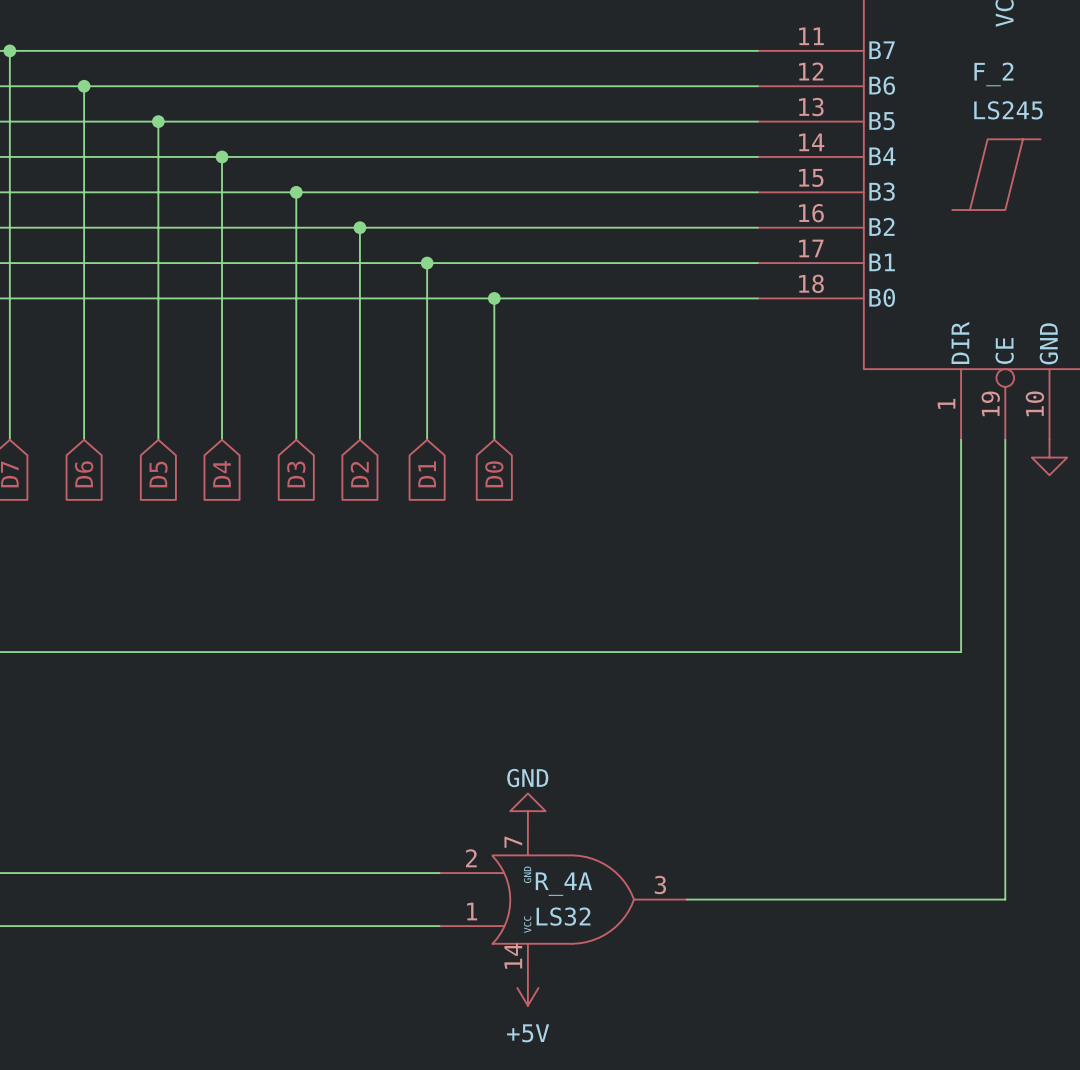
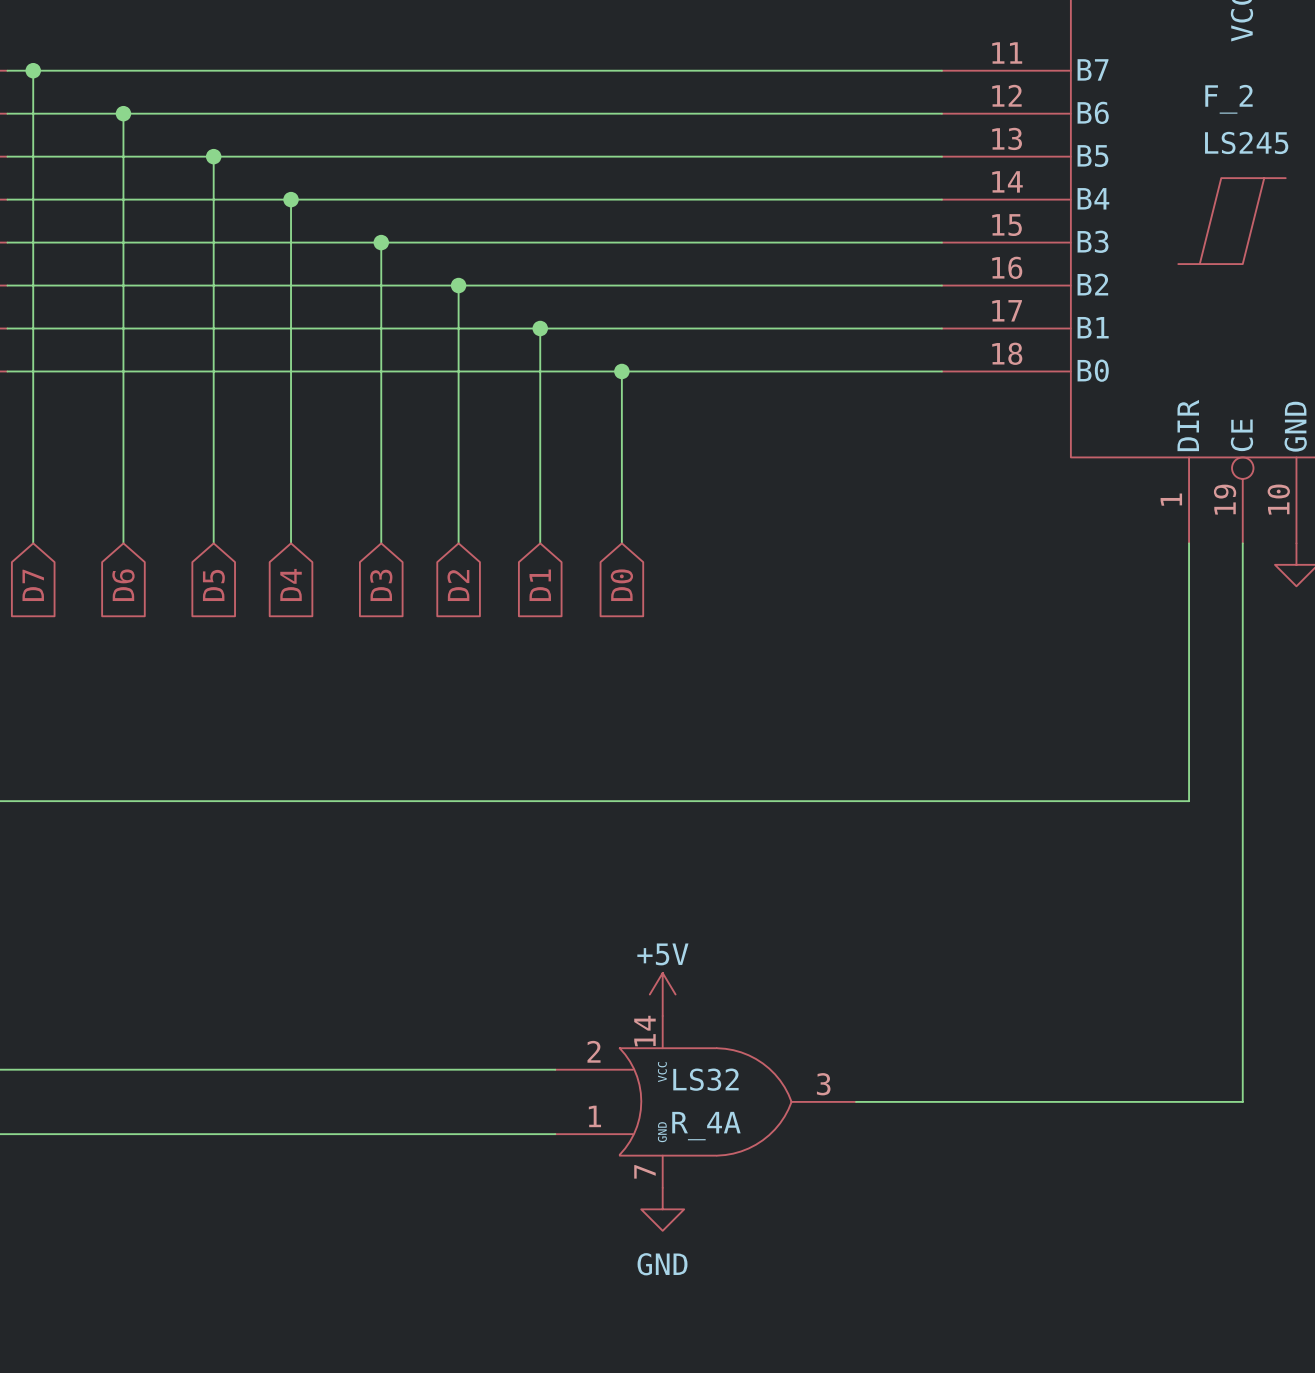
power symbol: GND (527, 811) -> +5V (662, 994)
R_4A symbol: [439, 828, 688, 971] -> [555, 1015, 857, 1188]
R_4A name position: R_4A (563, 884) -> R_4A (706, 1126)
R_4A value position: LS32 (563, 916) -> LS32 (705, 1079)
power symbol: +5V (527, 987) -> GND (662, 1209)

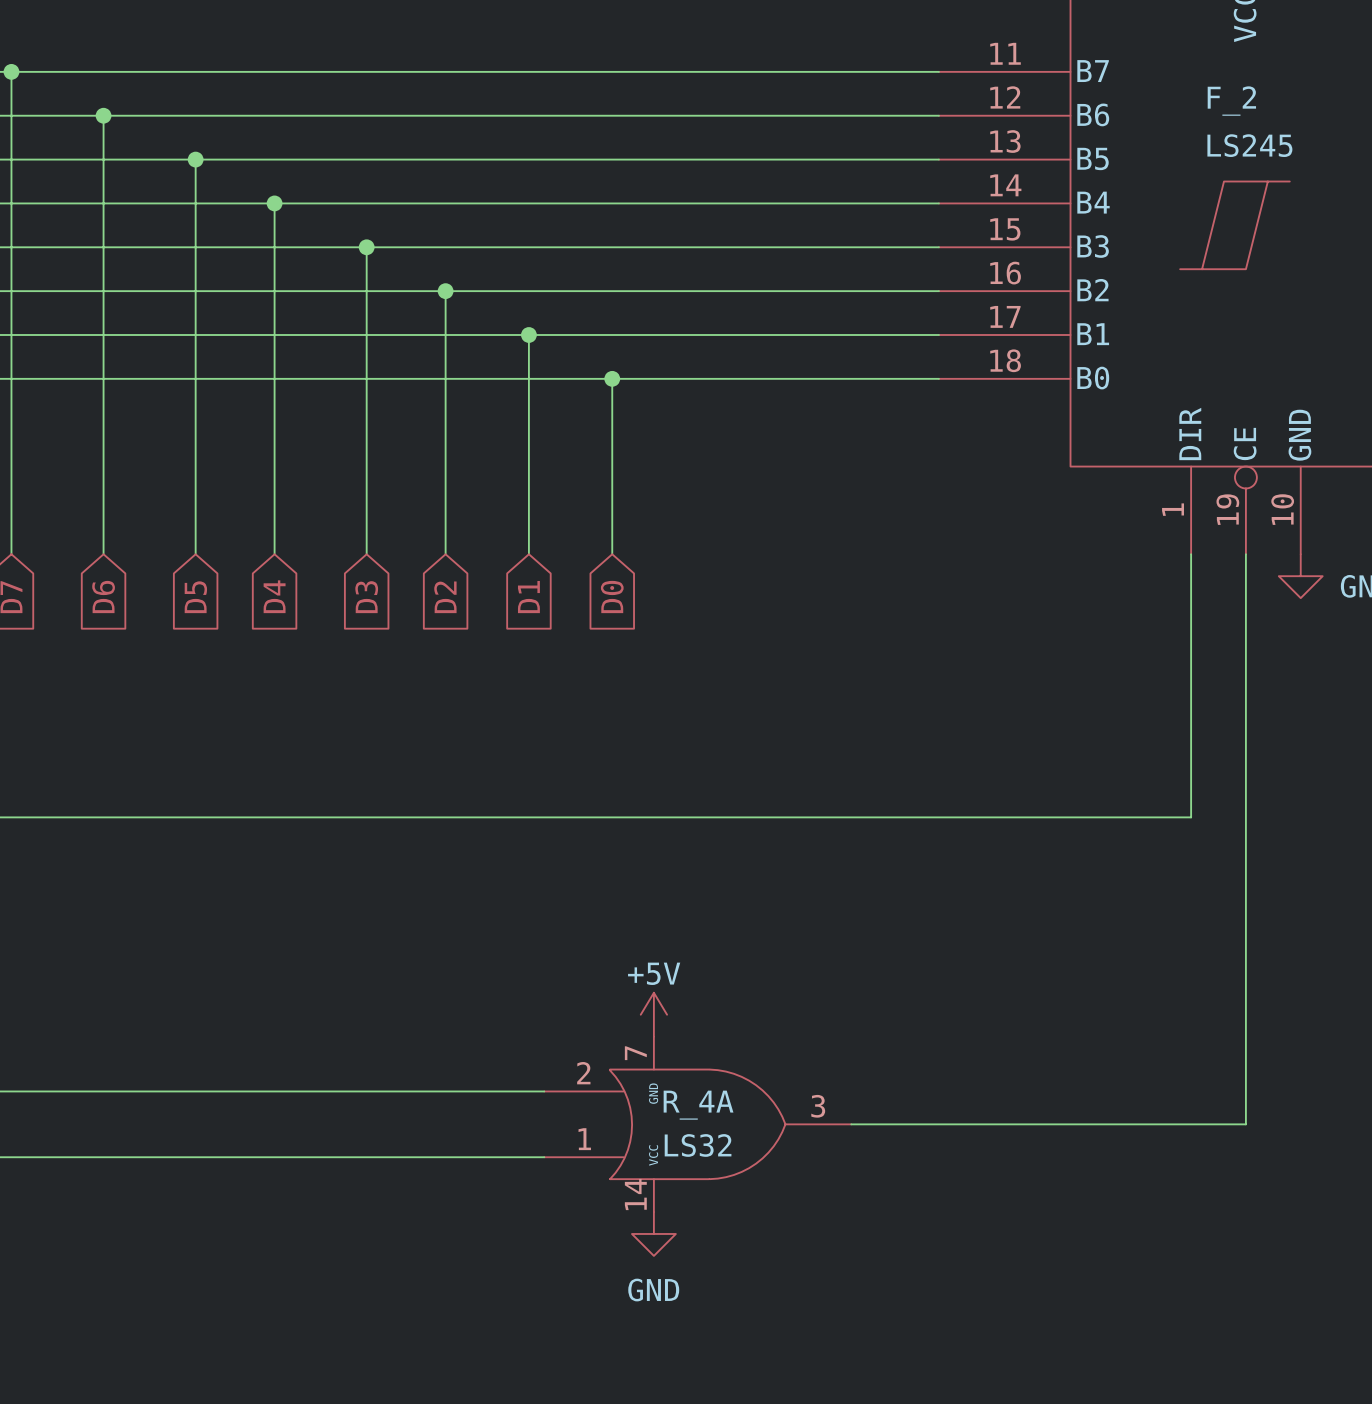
R_4A symbol: [555, 1015, 857, 1188] -> [544, 1036, 852, 1213]
R_4A value position: LS32 (705, 1079) -> LS32 (698, 1145)
R_4A name position: R_4A (706, 1126) -> R_4A (698, 1105)

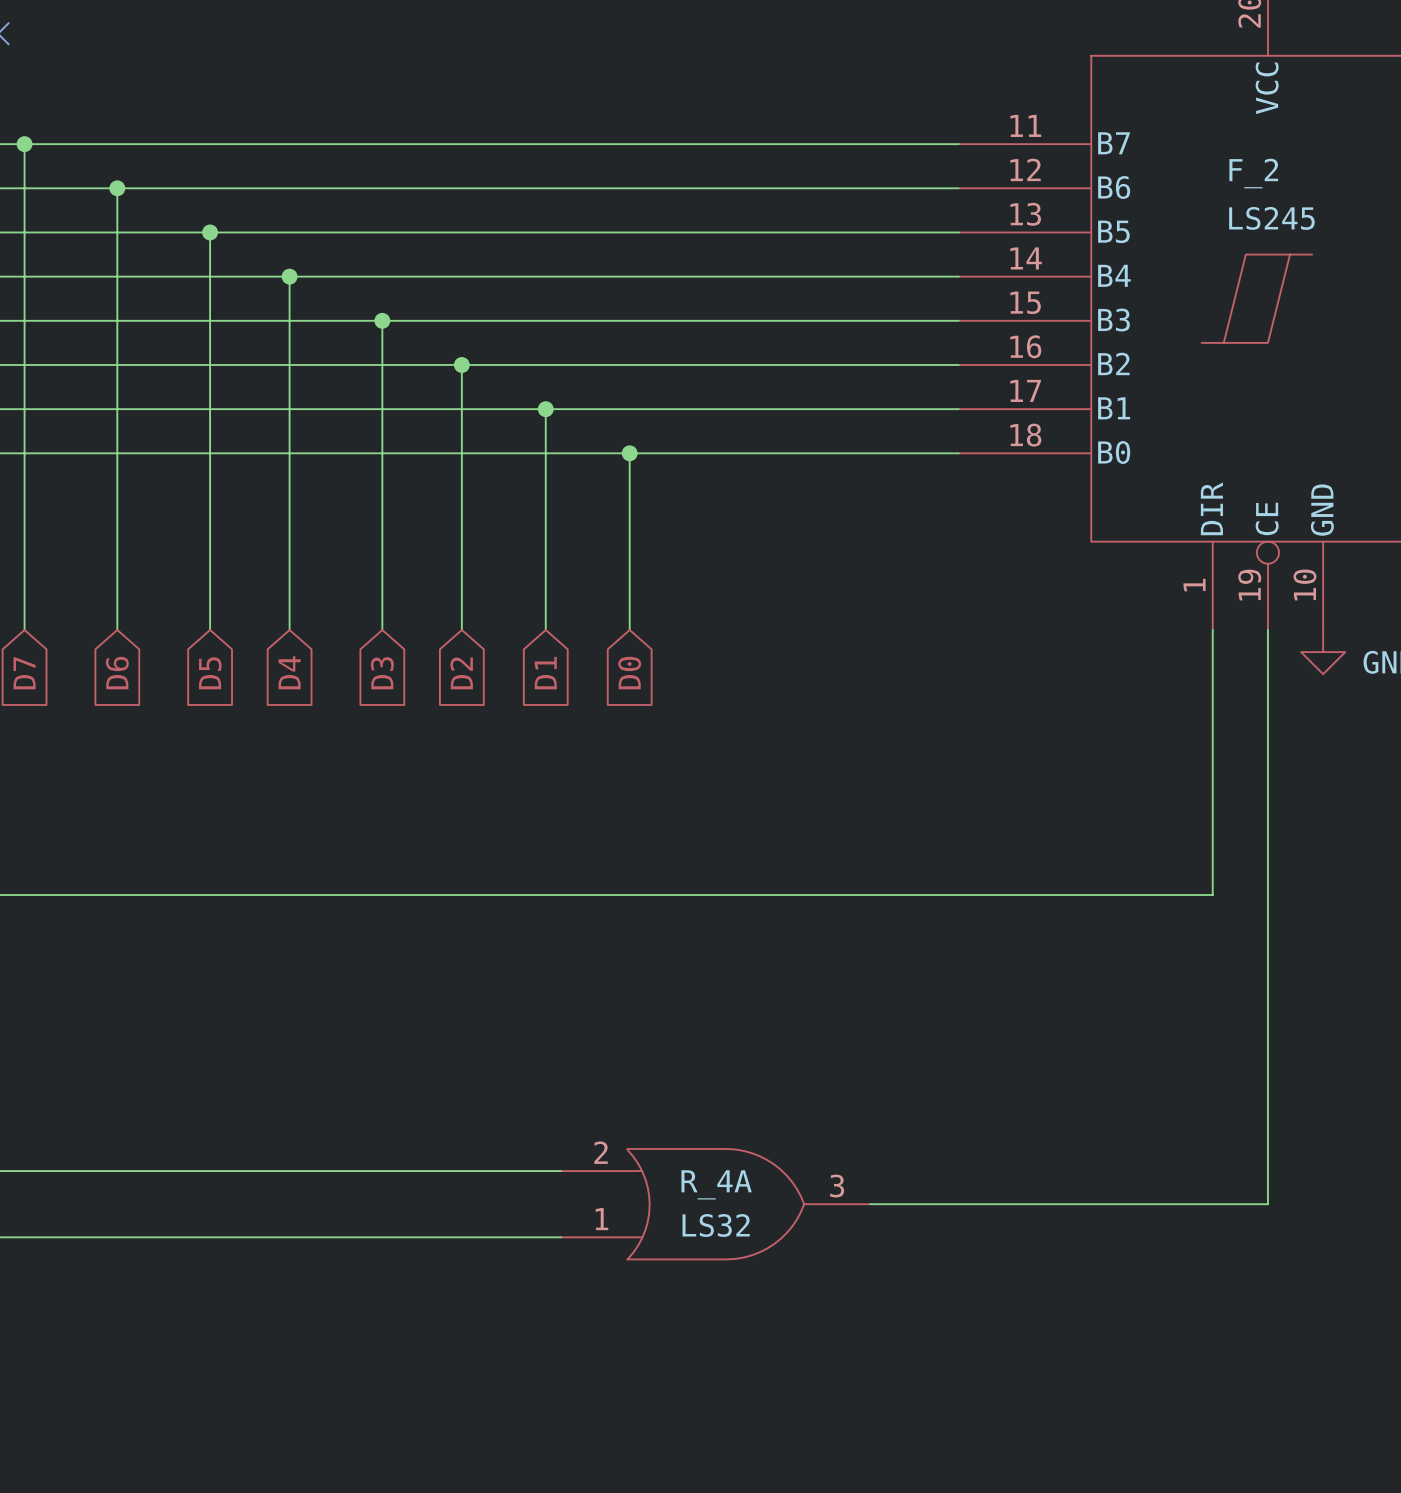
power symbol: +5V (653, 1014) -> none
R_4A symbol: [544, 1036, 852, 1213] -> [561, 1148, 871, 1260]
power symbol: GND (653, 1233) -> none

